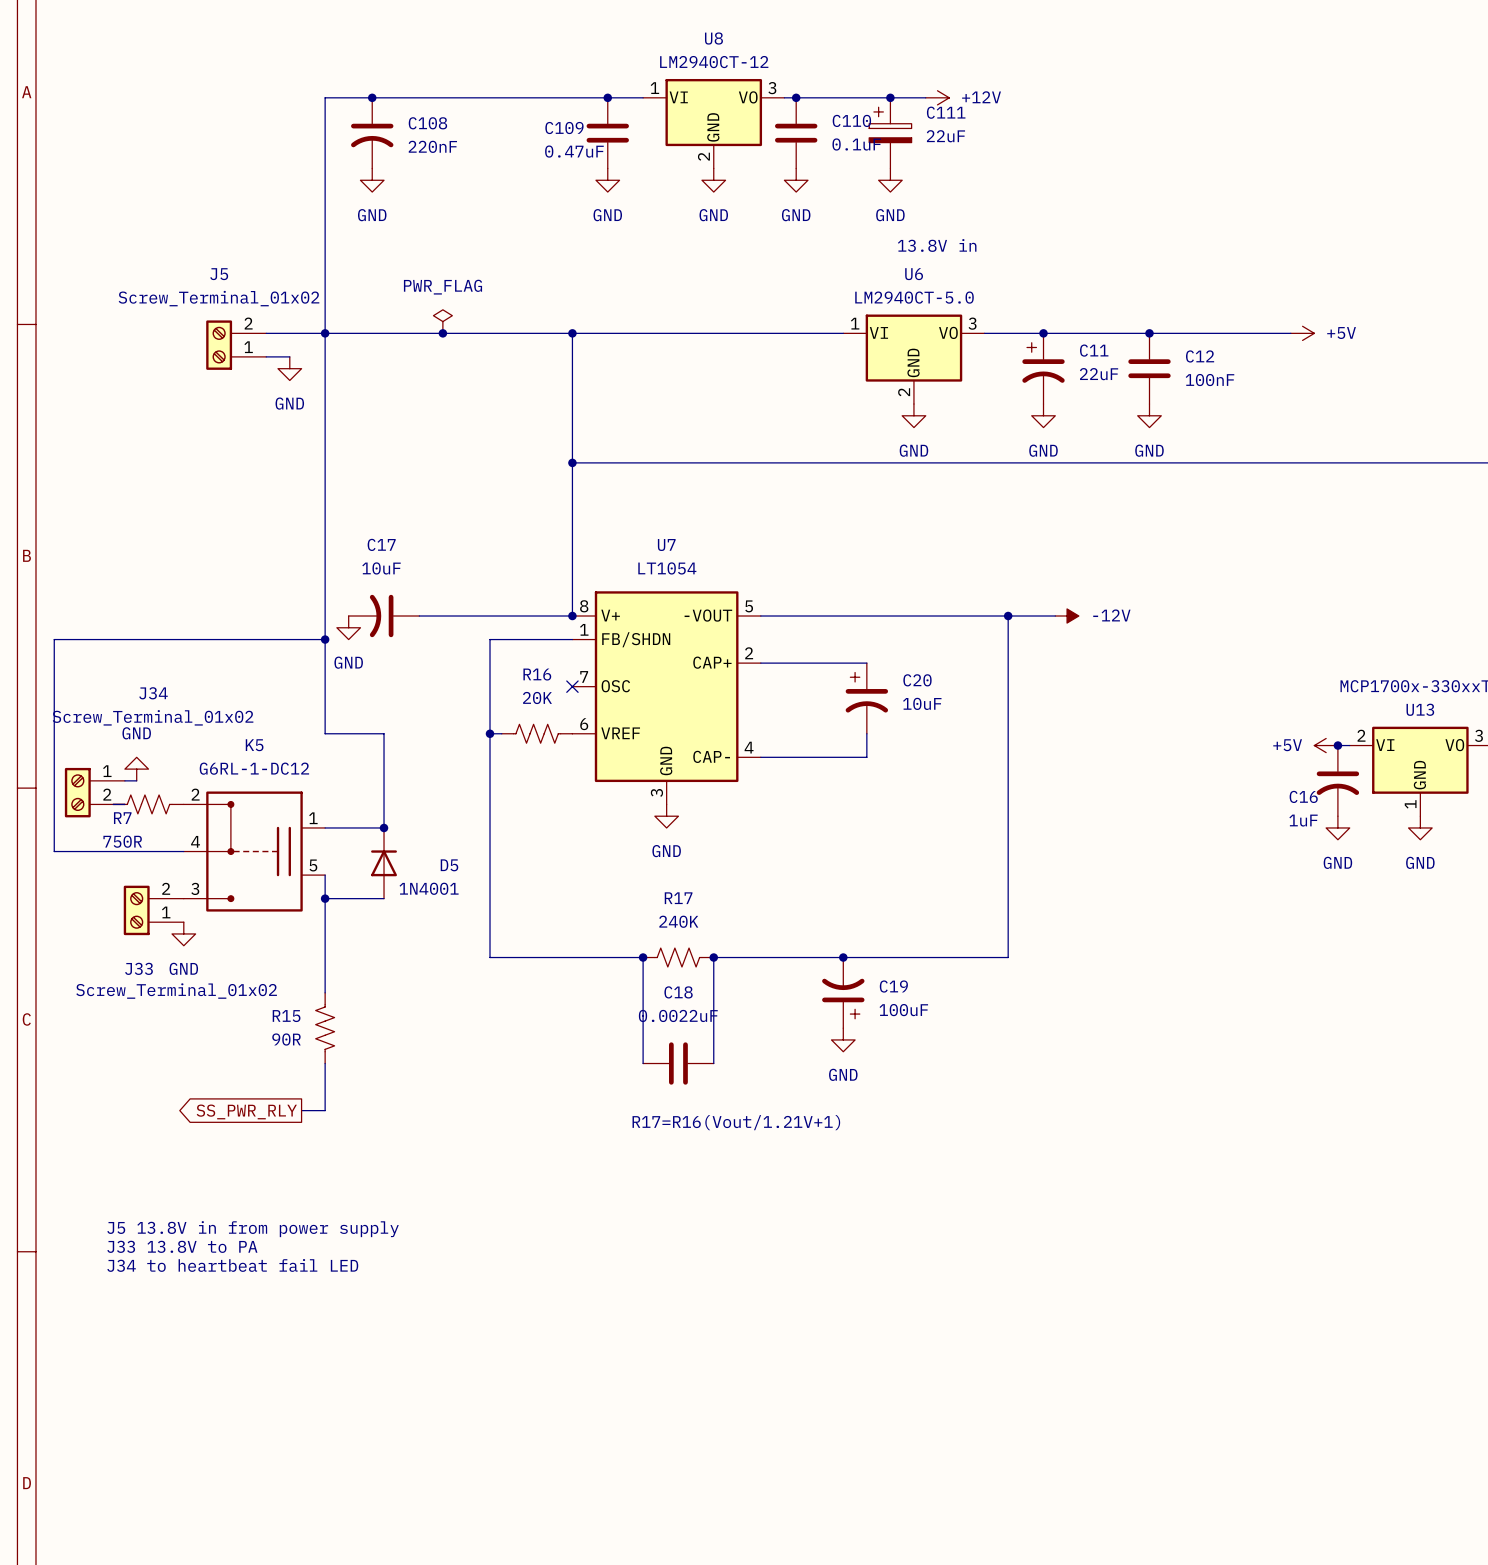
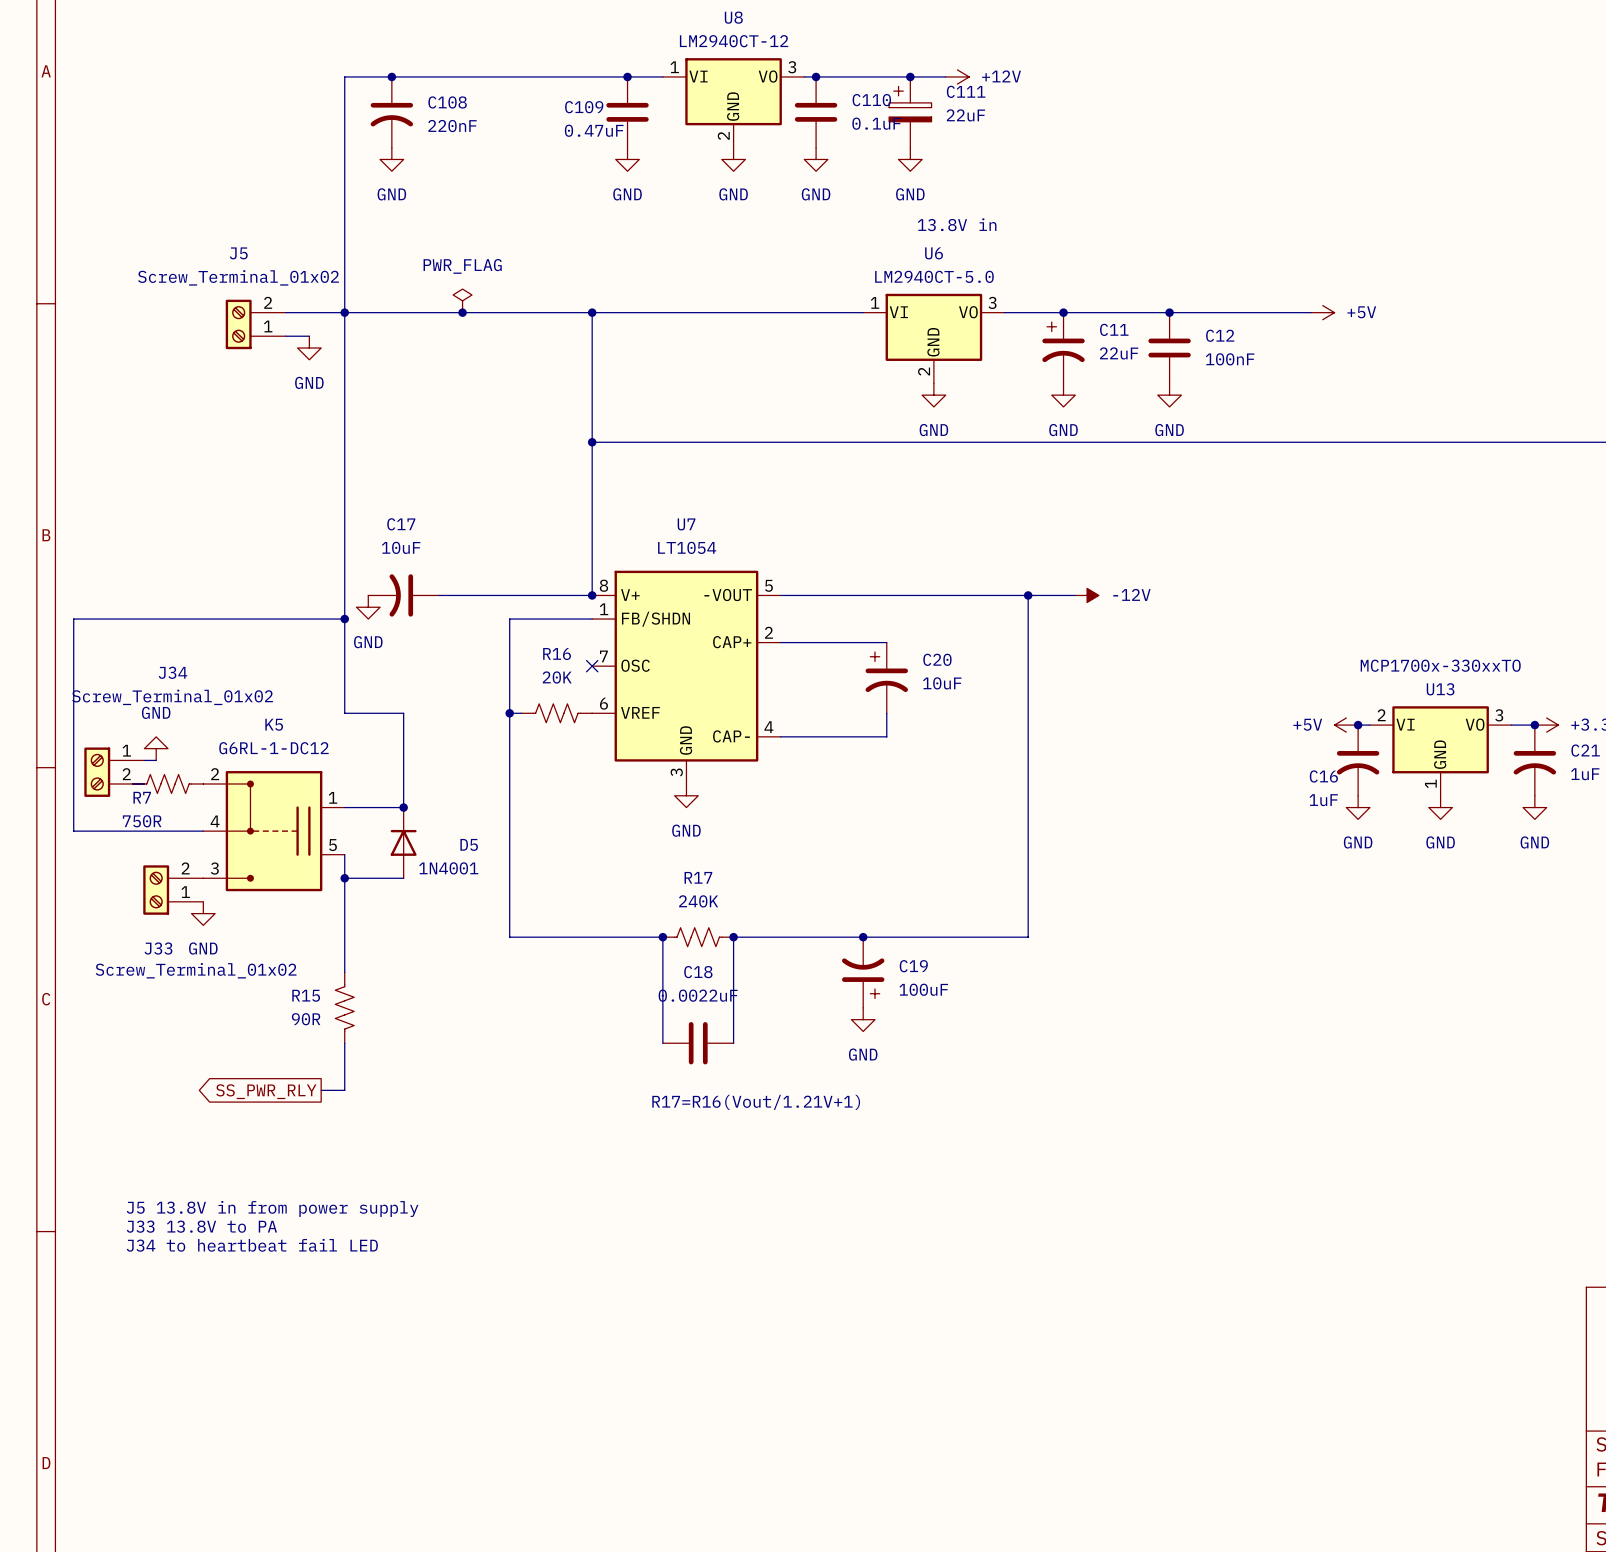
K5 symbol: [183, 791, 326, 912] -> [203, 771, 345, 892]

